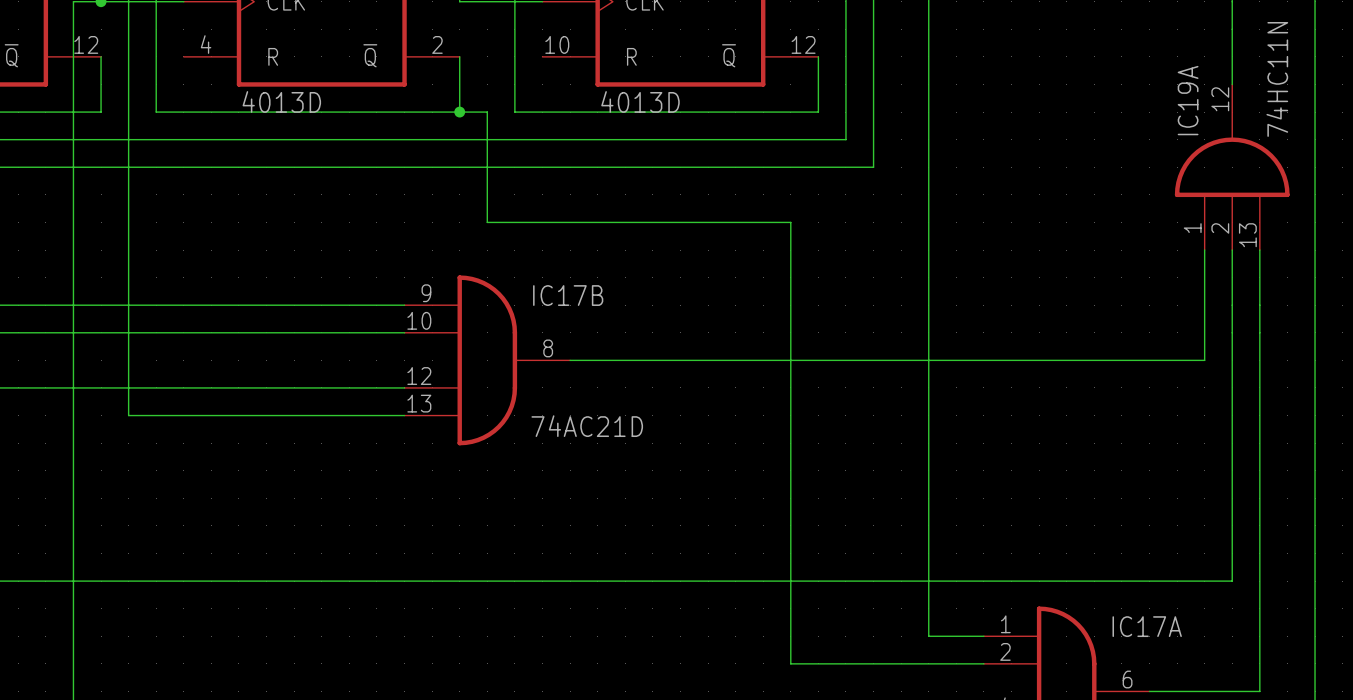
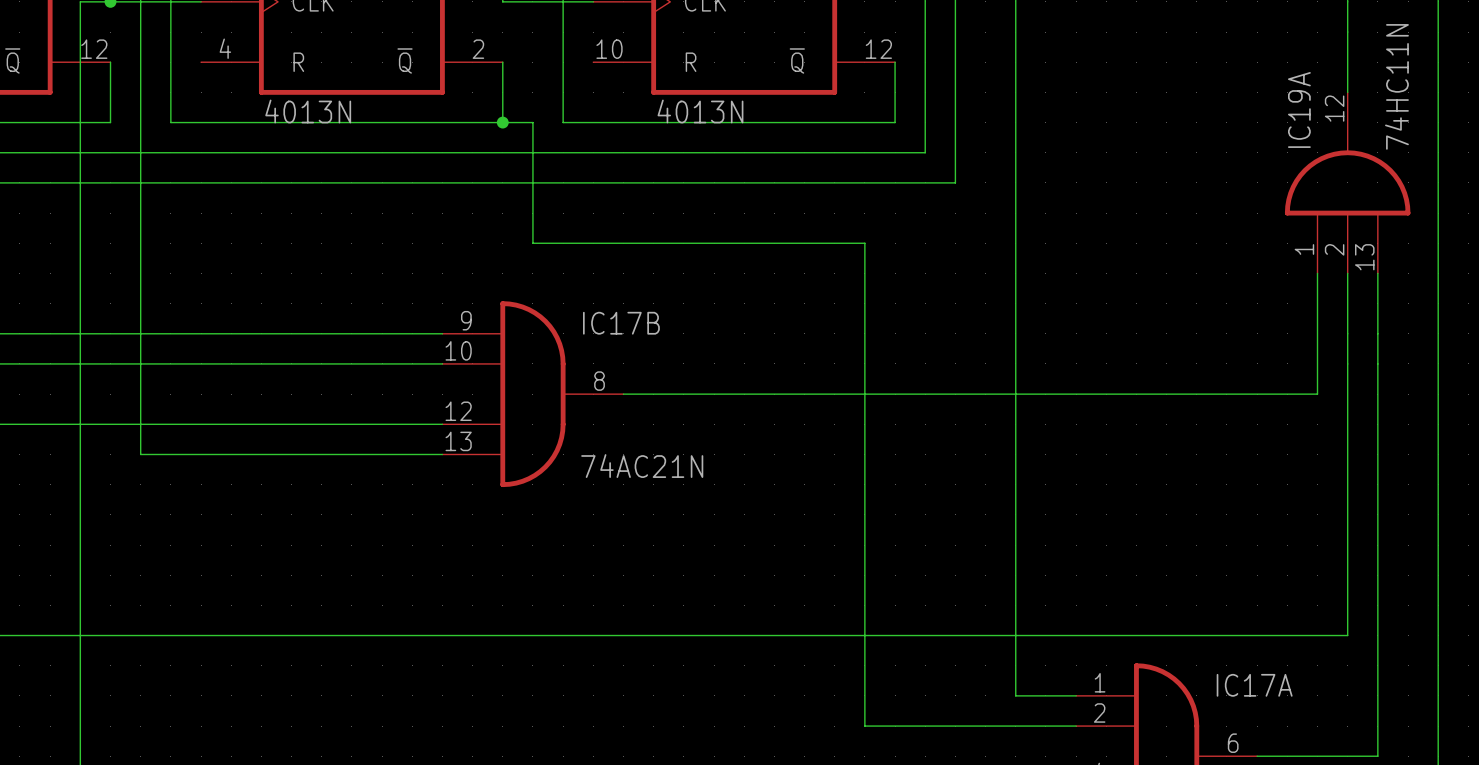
part value: 4013D (281, 101) -> 4013N (308, 111)
part value: 4013D (640, 101) -> 4013N (700, 111)
IC17B value: 74AC21D (587, 426) -> 74AC21N (642, 466)

